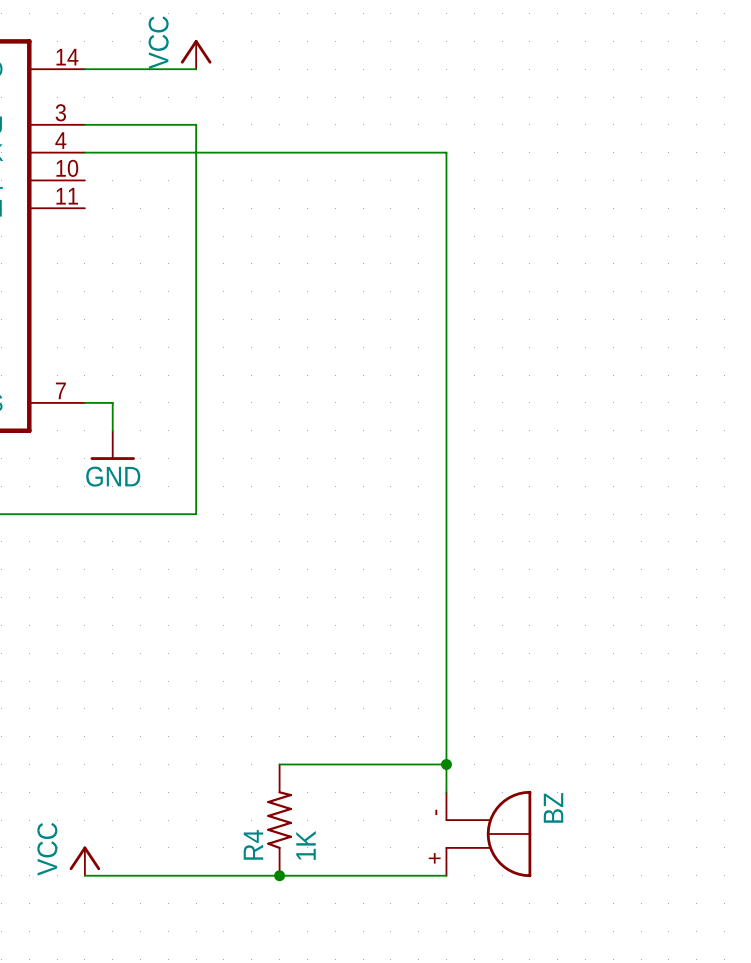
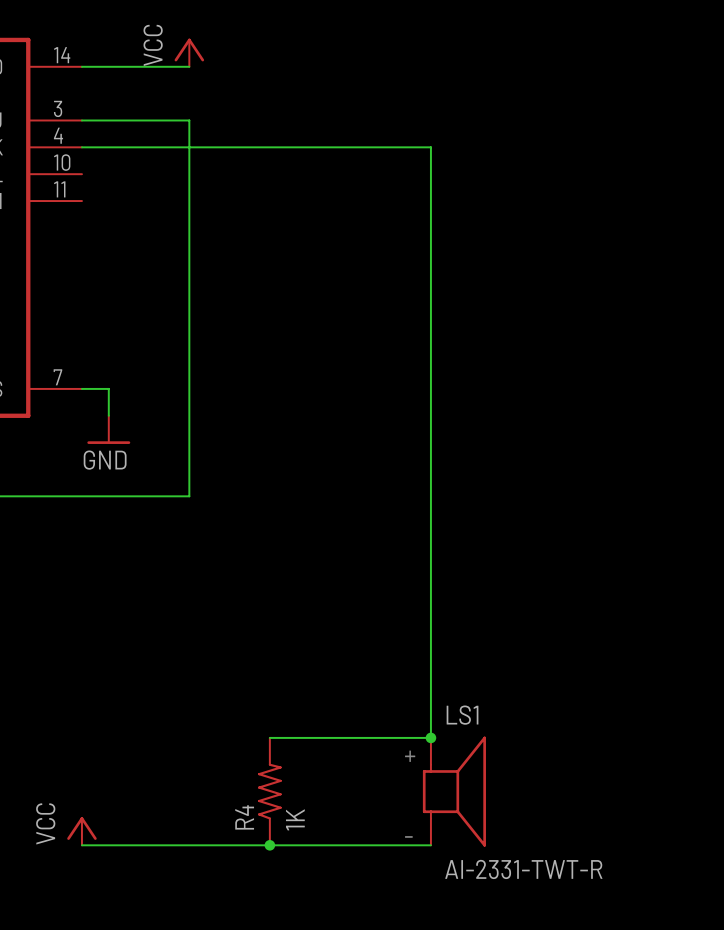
LS1: none -> AI-2331-TWT-R (454, 791)
BZ: (488, 834) -> none

